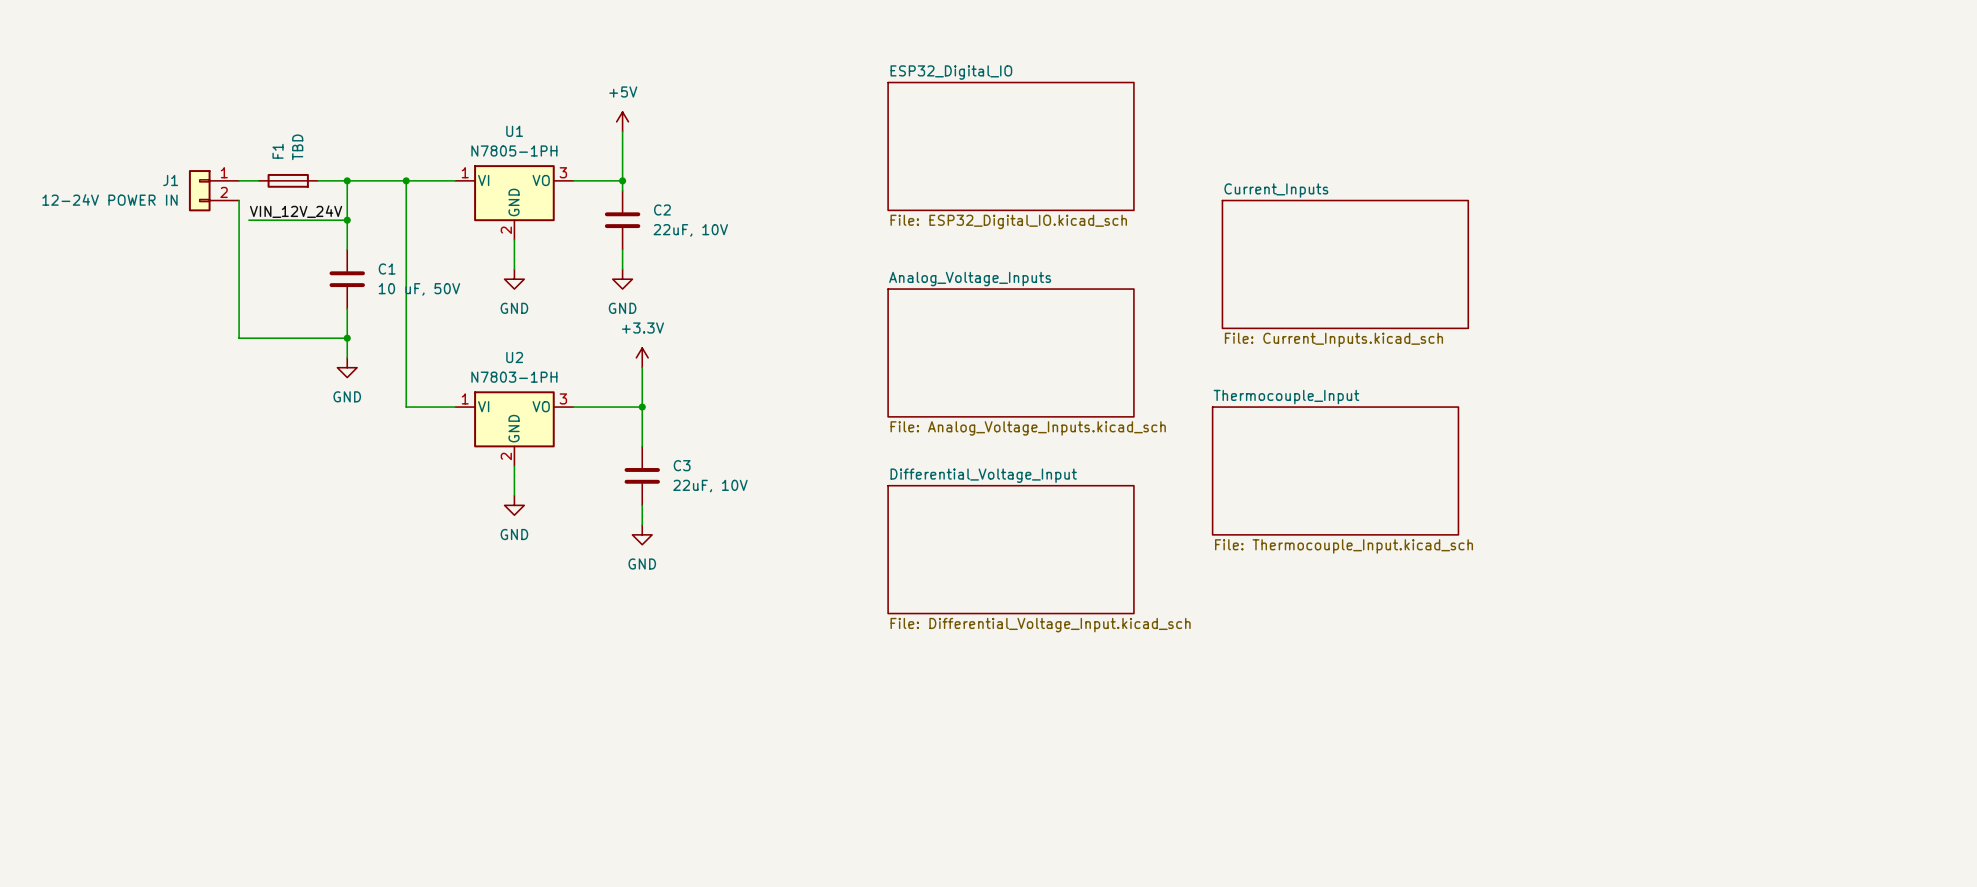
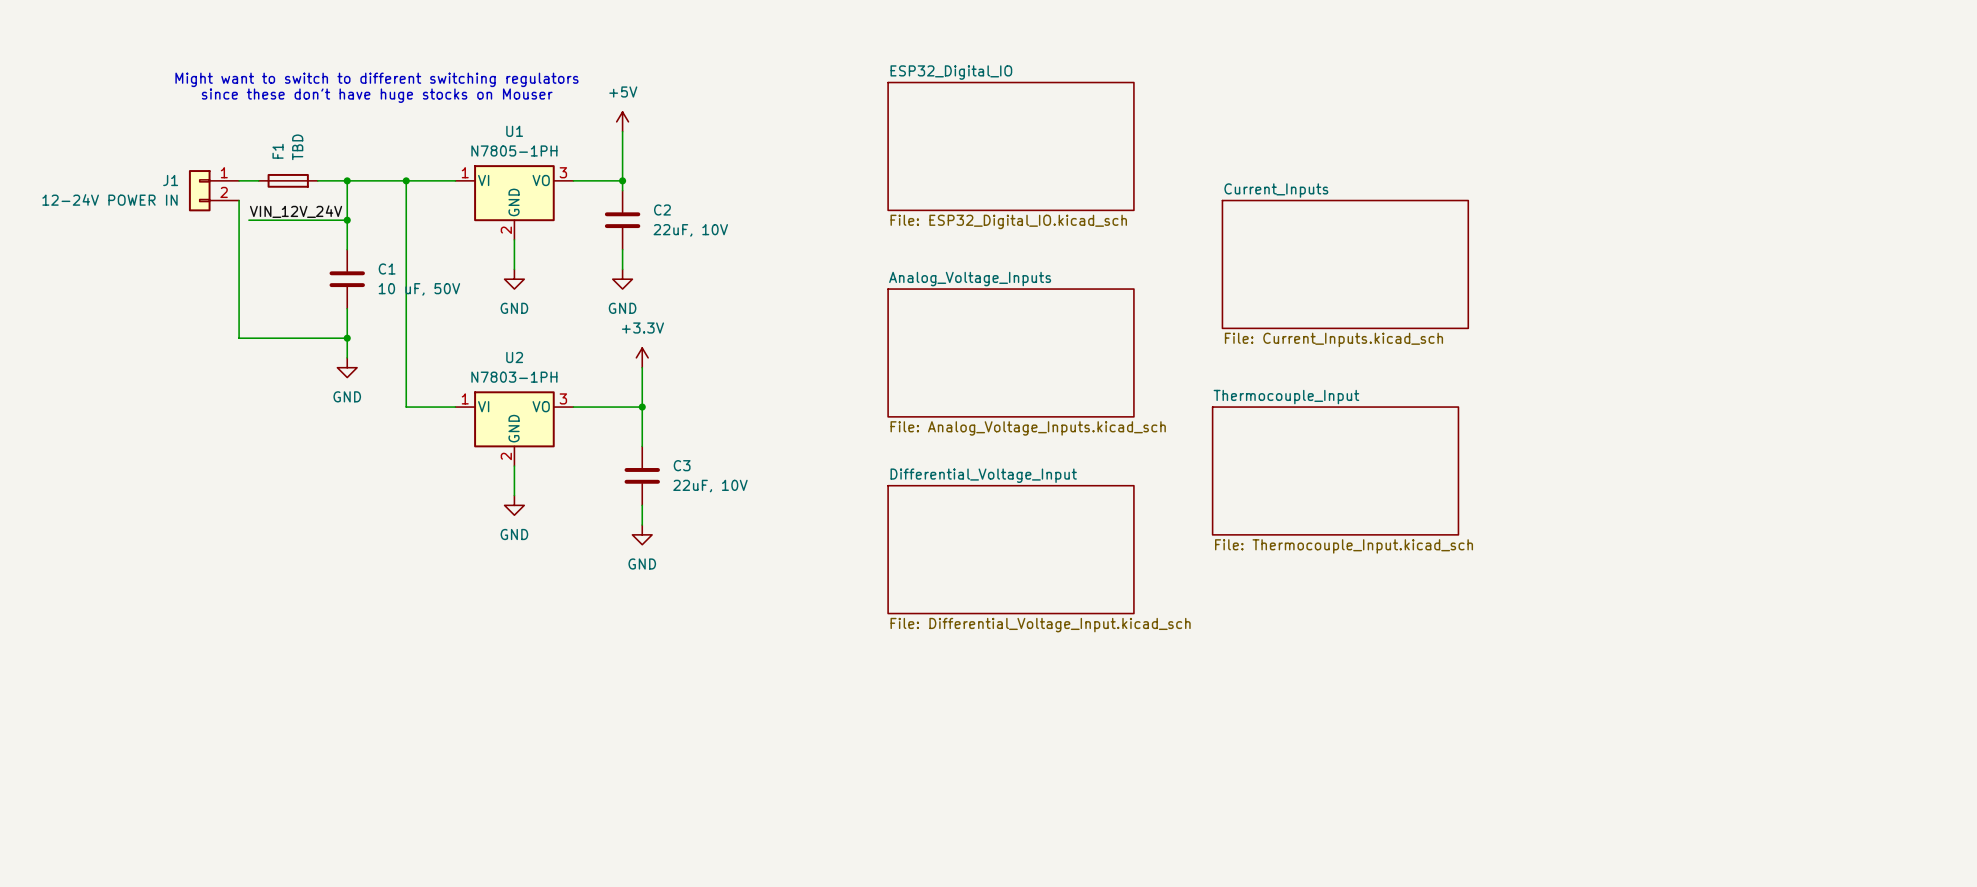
text: none -> Might want to switch to different switching regulators (376, 79)
text: none -> since these don't have huge stocks on Mouser (377, 95)

